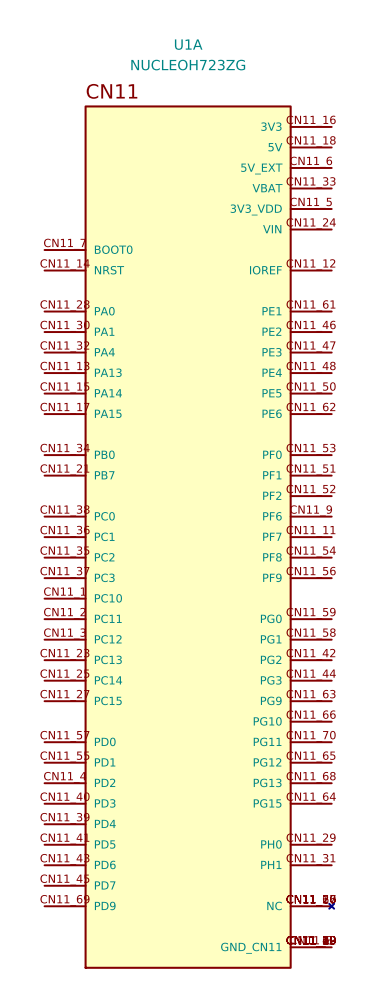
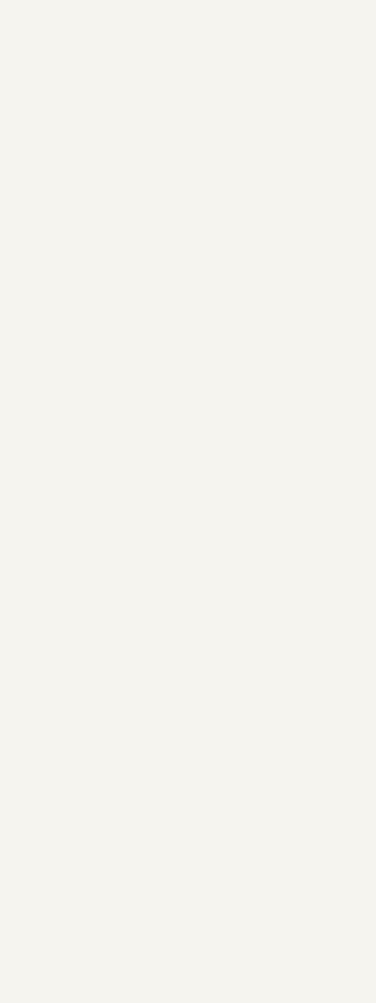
U1A: NUCLEOH723ZG (189, 537) -> none

